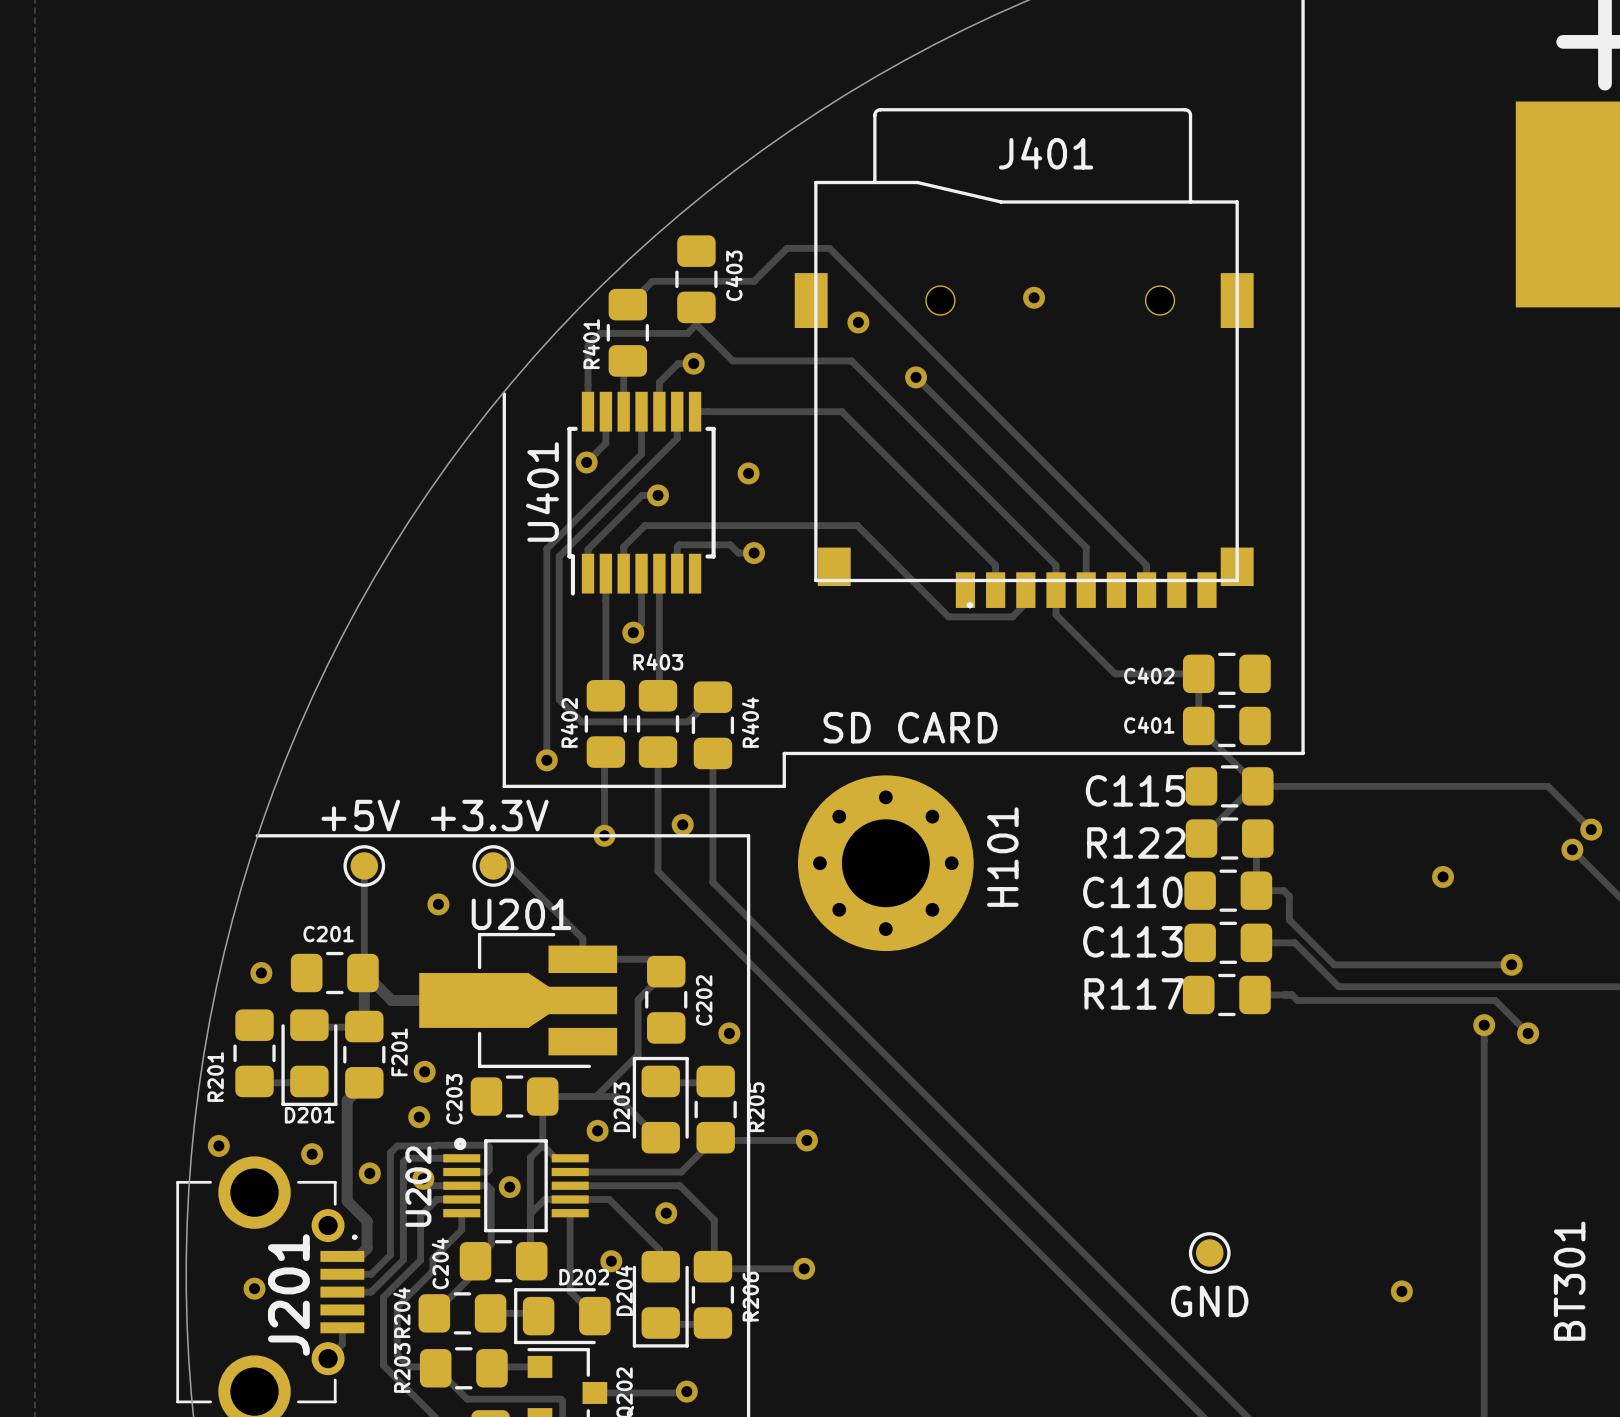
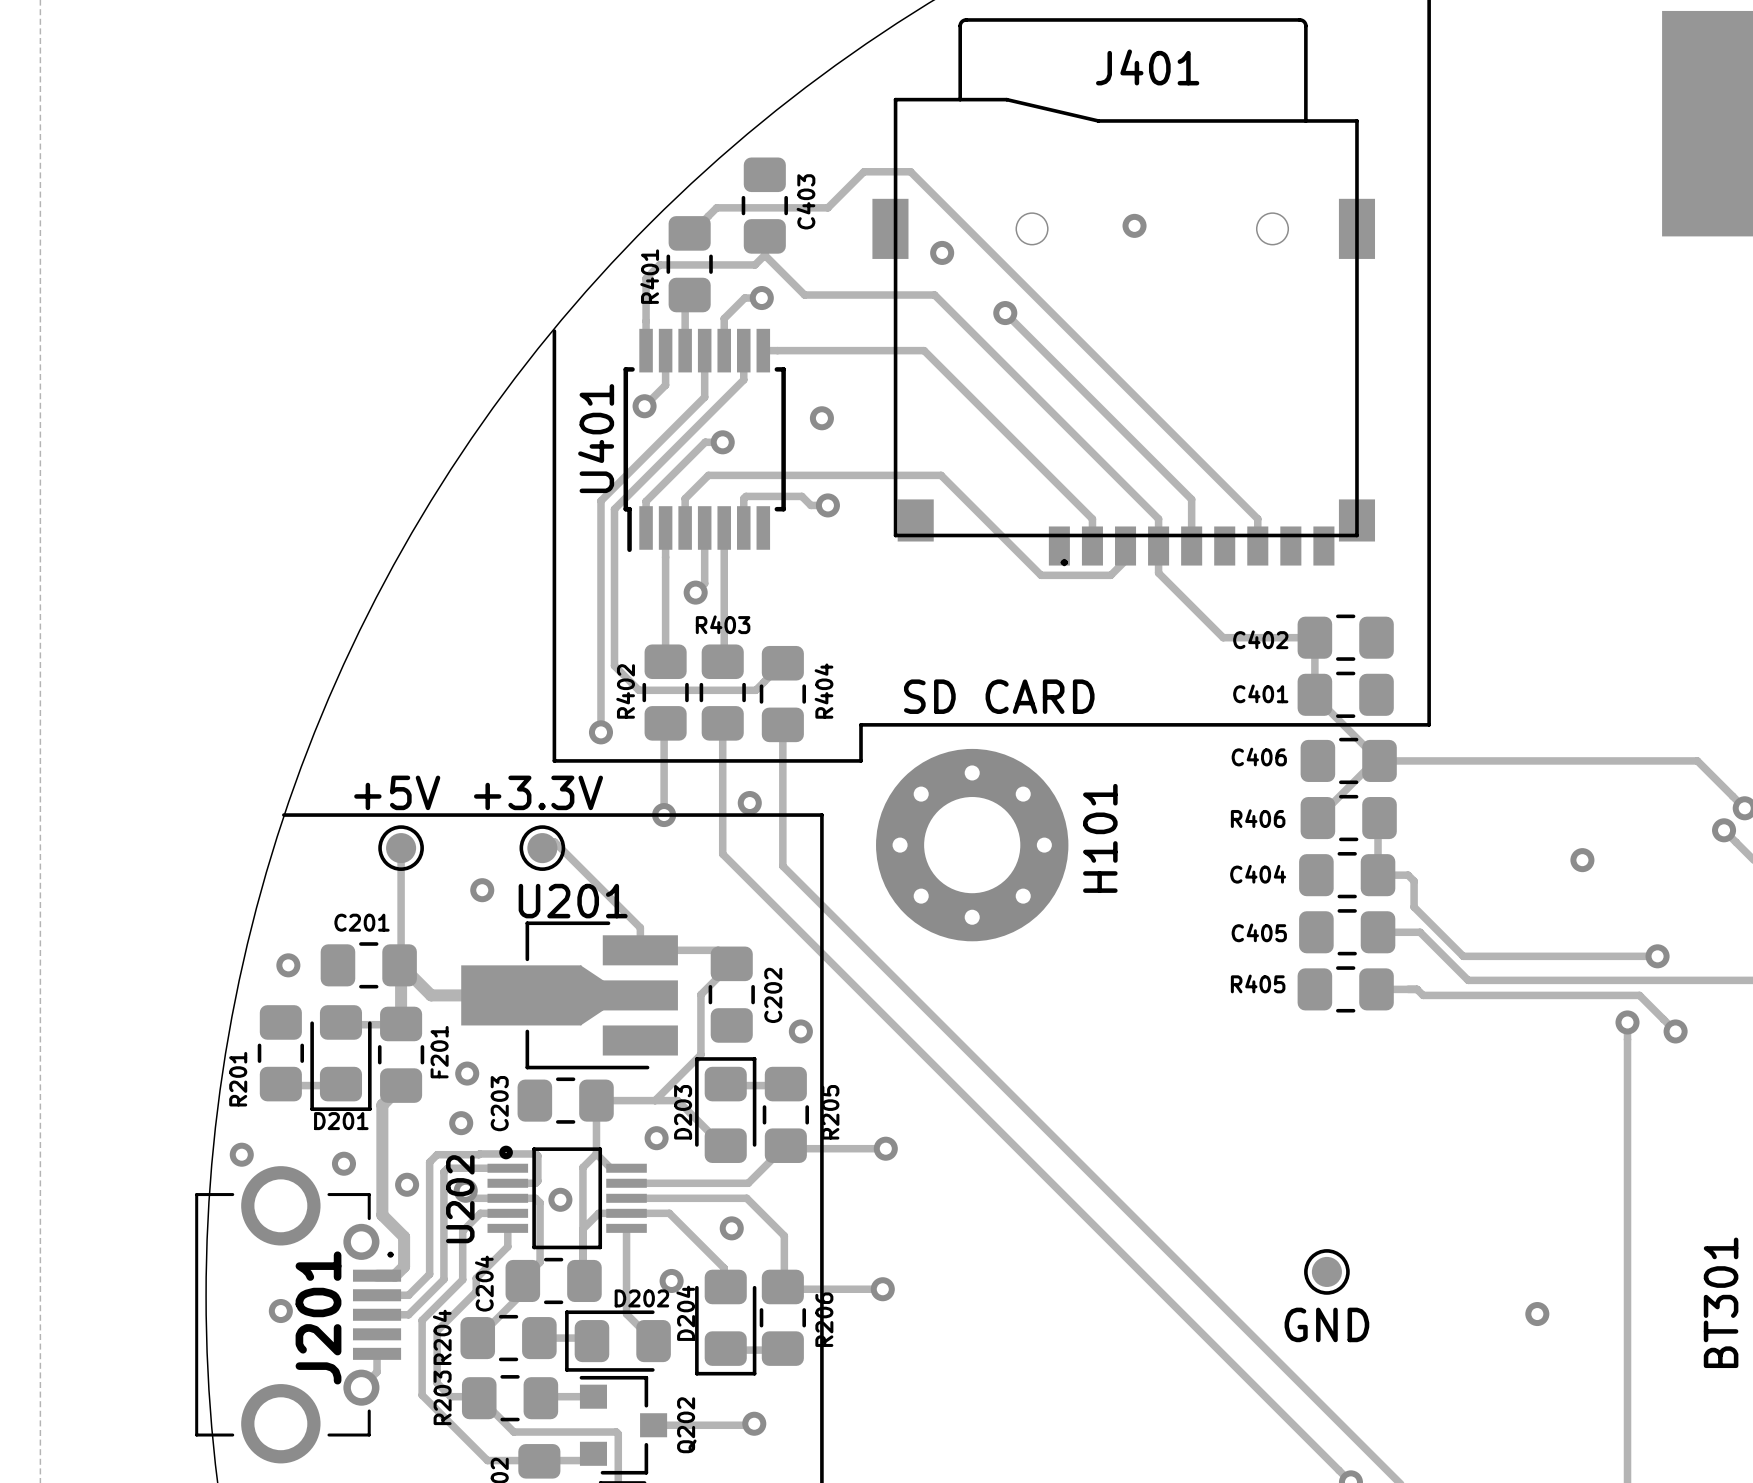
C115 name: C115 (1135, 790) -> C406 (1259, 757)
R122 name: R122 (1136, 842) -> R406 (1258, 818)
C110 name: C110 (1132, 892) -> C404 (1258, 874)
C113 name: C113 (1132, 941) -> C405 (1259, 932)
R117 name: R117 (1134, 993) -> R405 (1258, 983)

